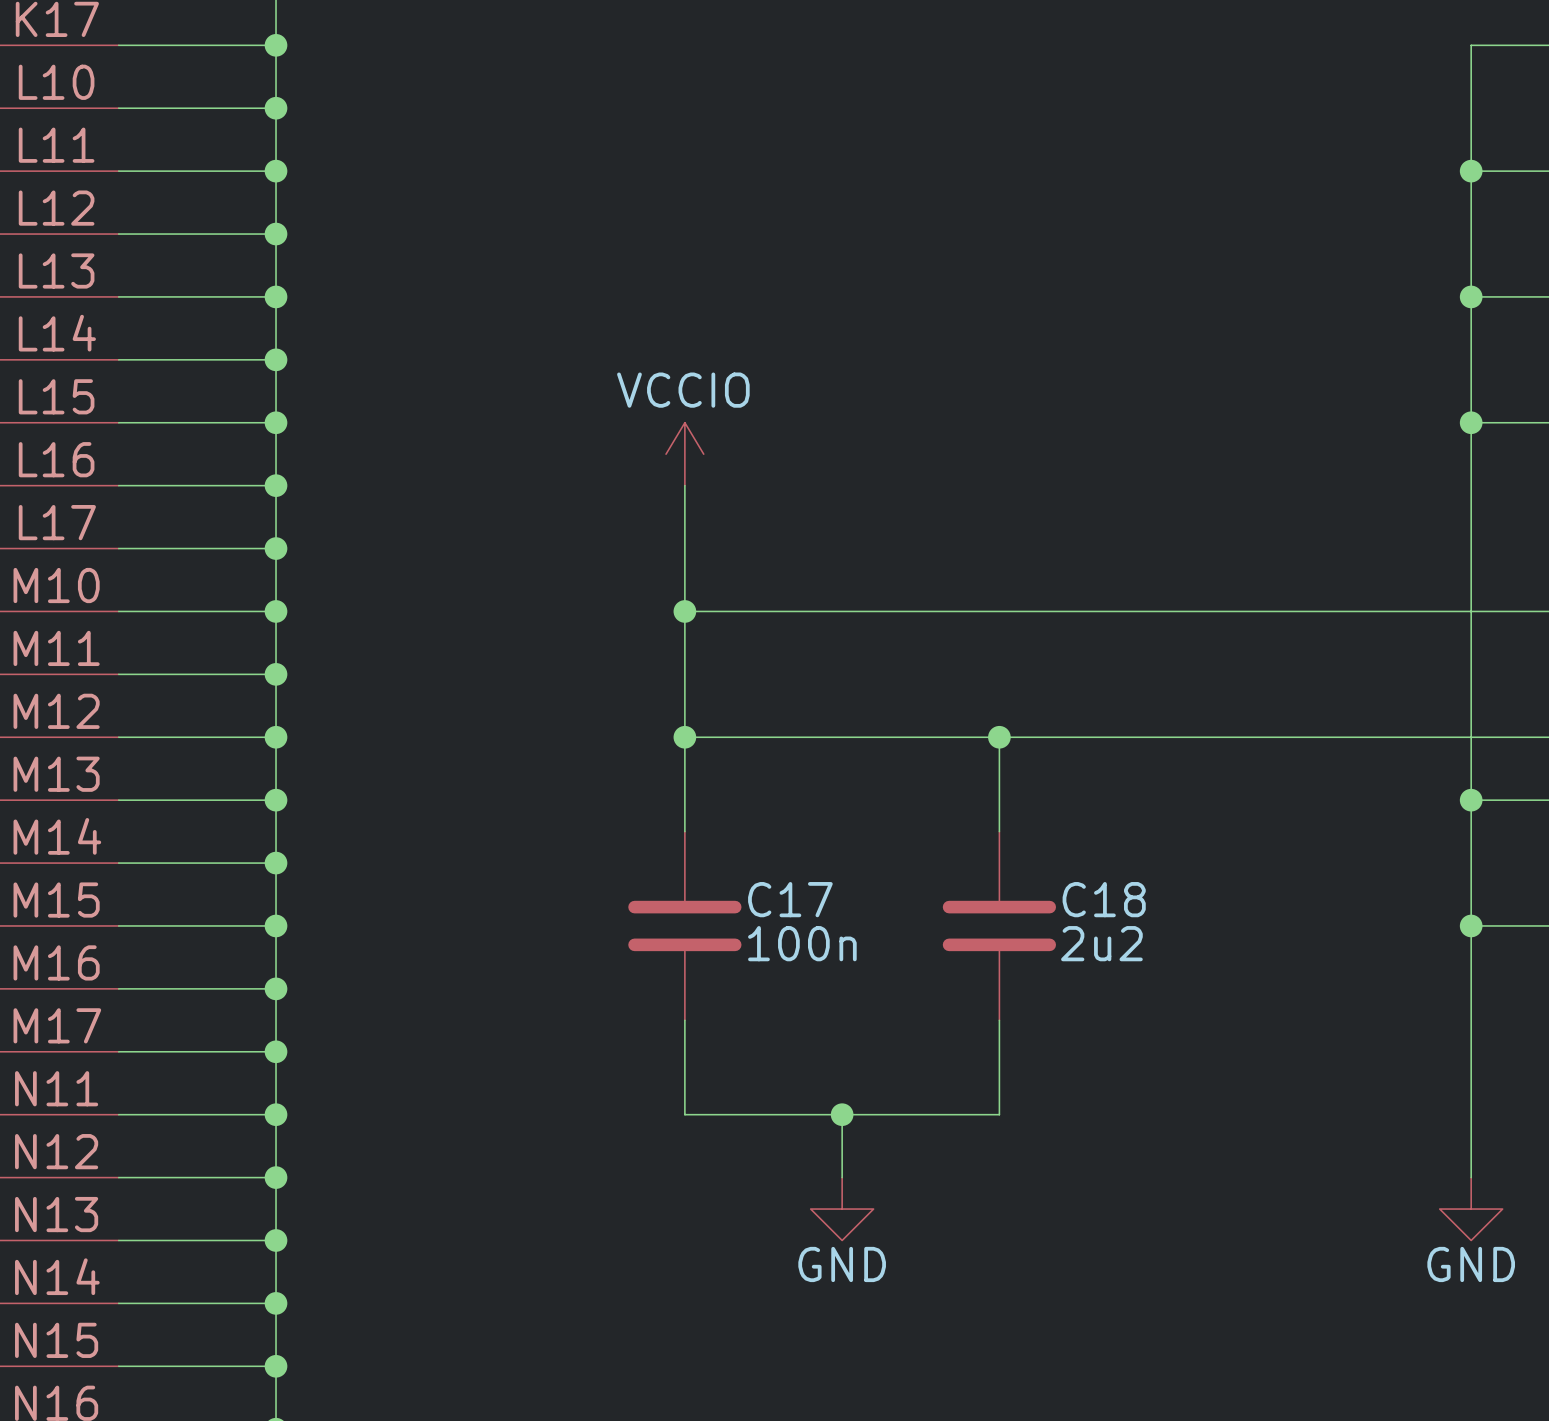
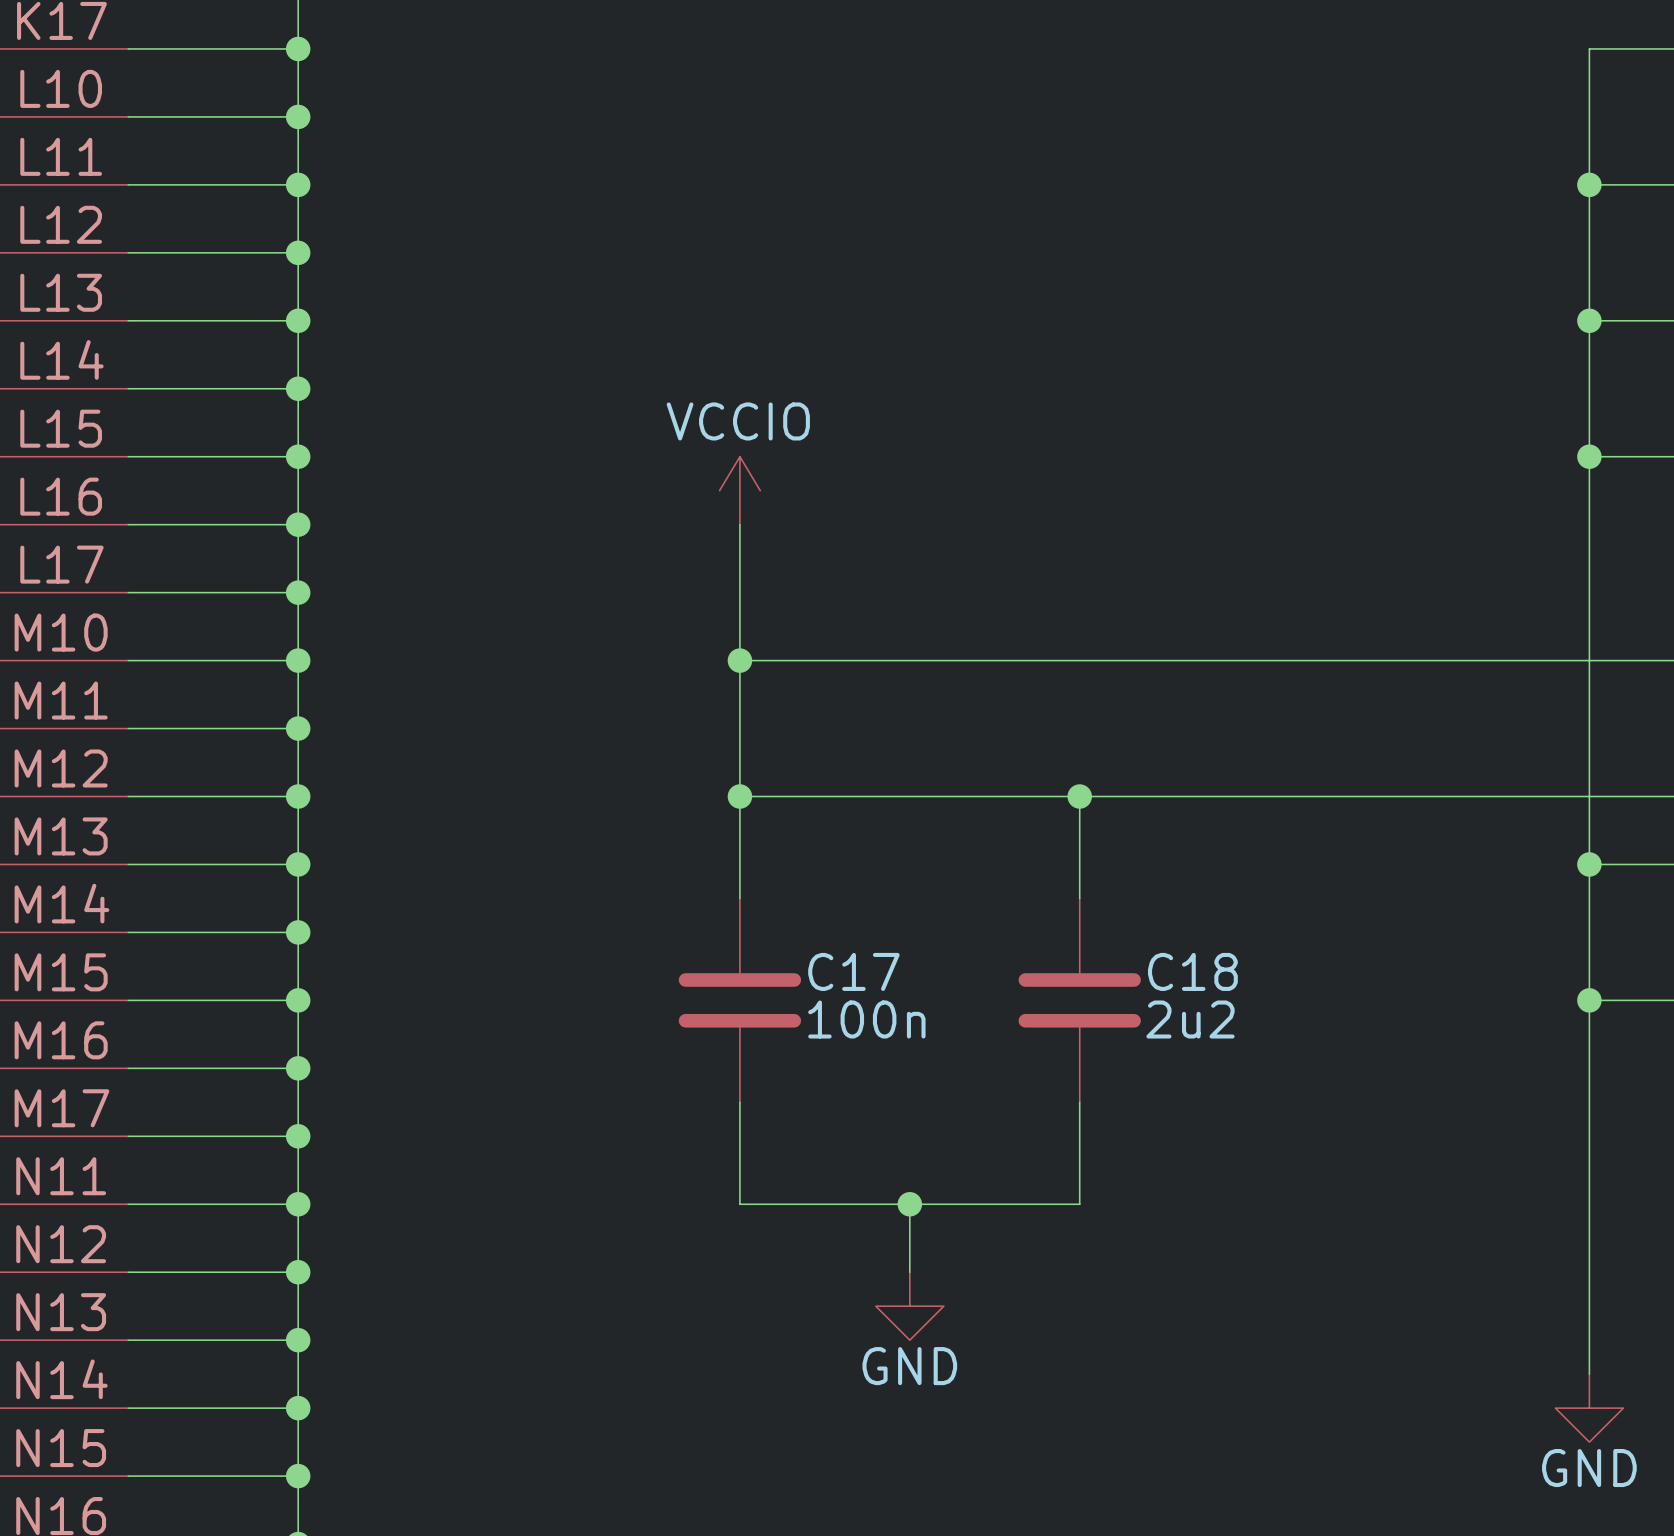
wire: none -> (1589, 1272) (1589, 1374)
power symbol position: GND (1471, 1209) -> GND (1589, 1408)

